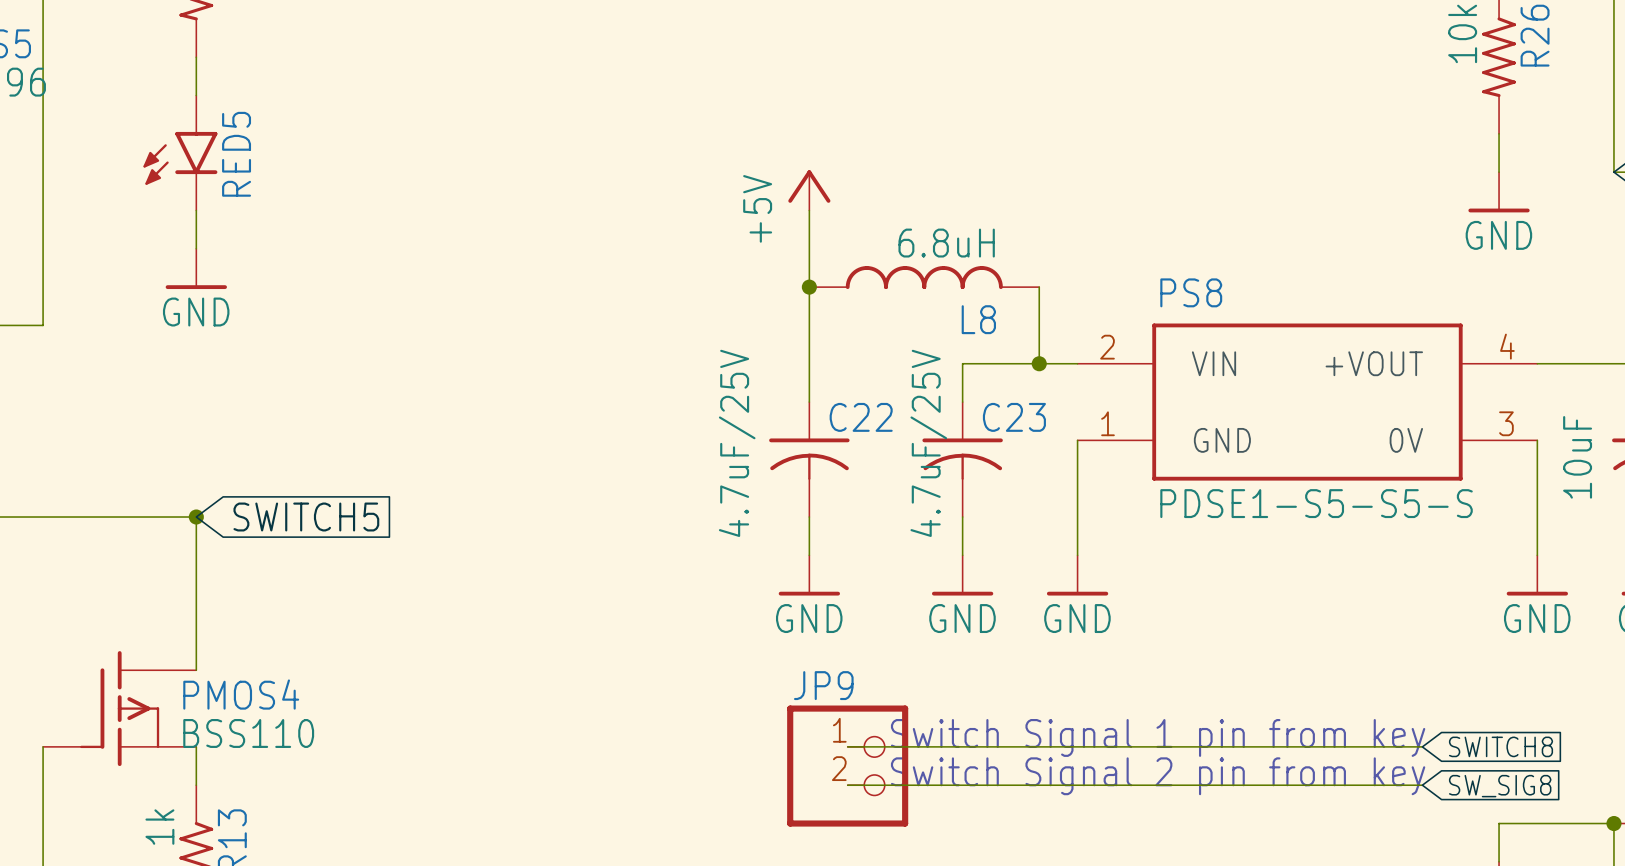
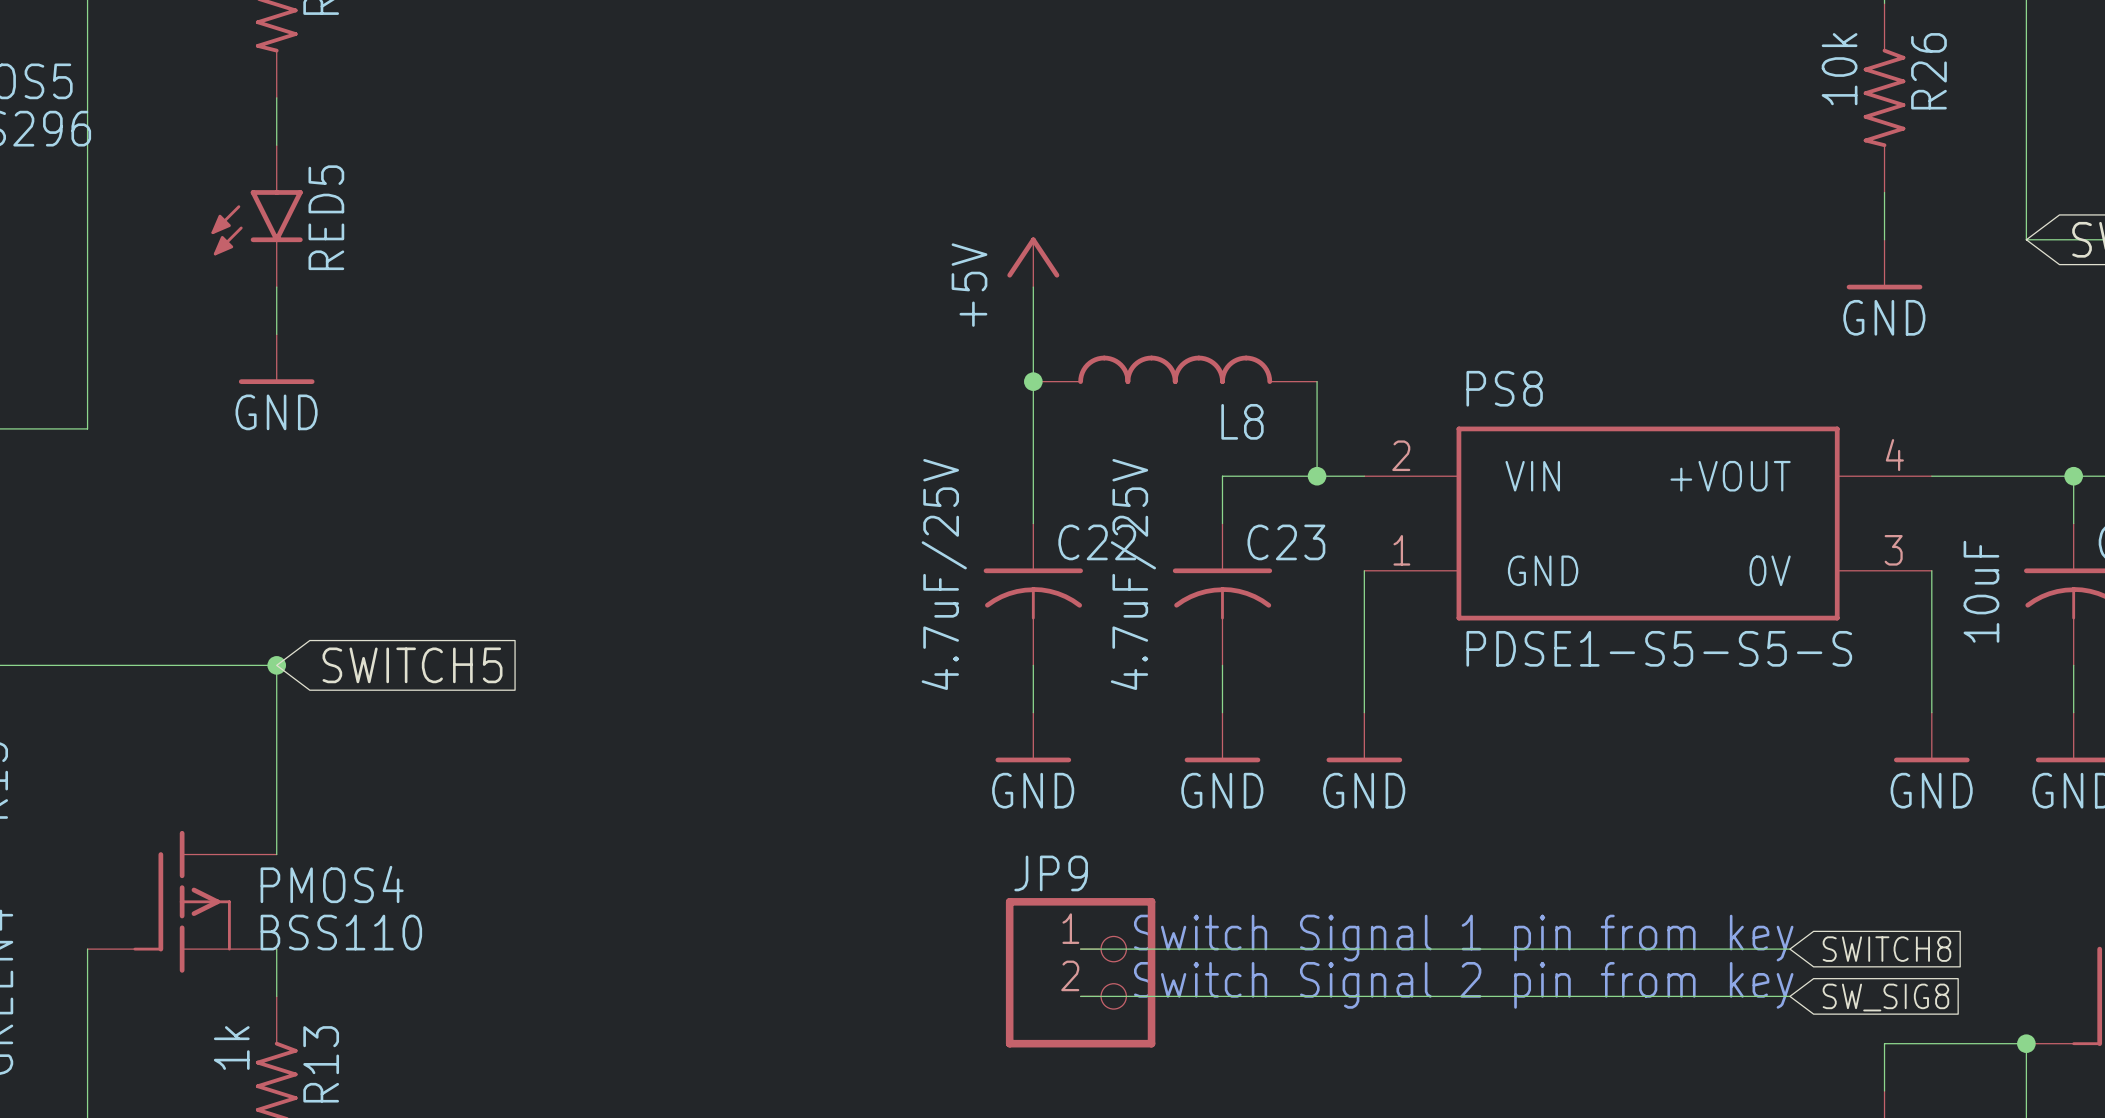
L8 value: 6.8uH (946, 243) -> none
C23 value position: 4.7uF/25V (928, 443) -> 4.7uF/25V (1133, 574)

